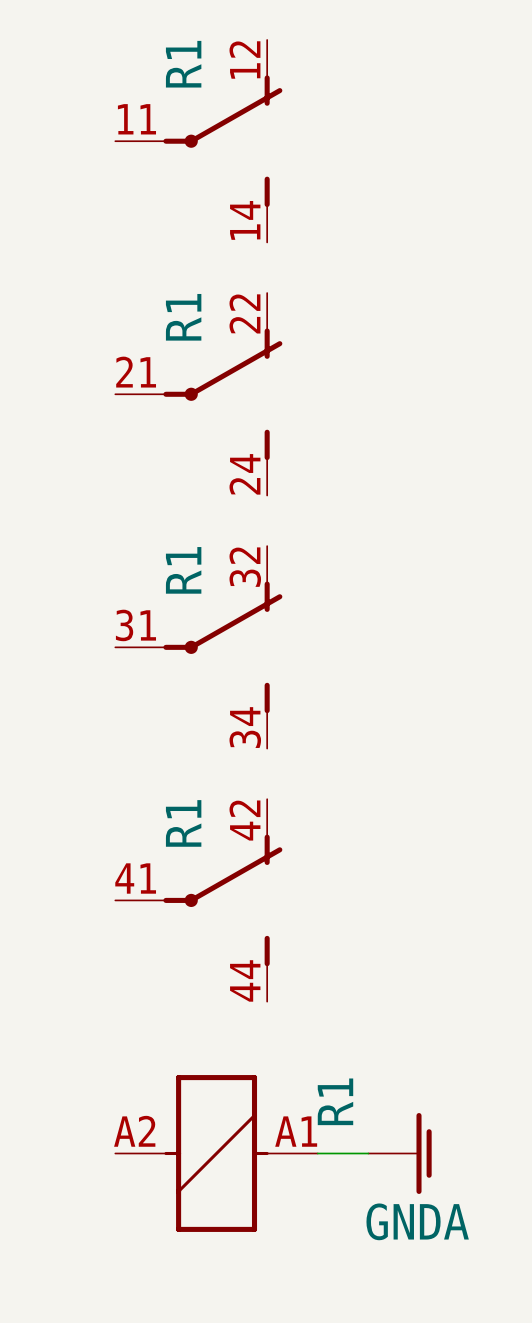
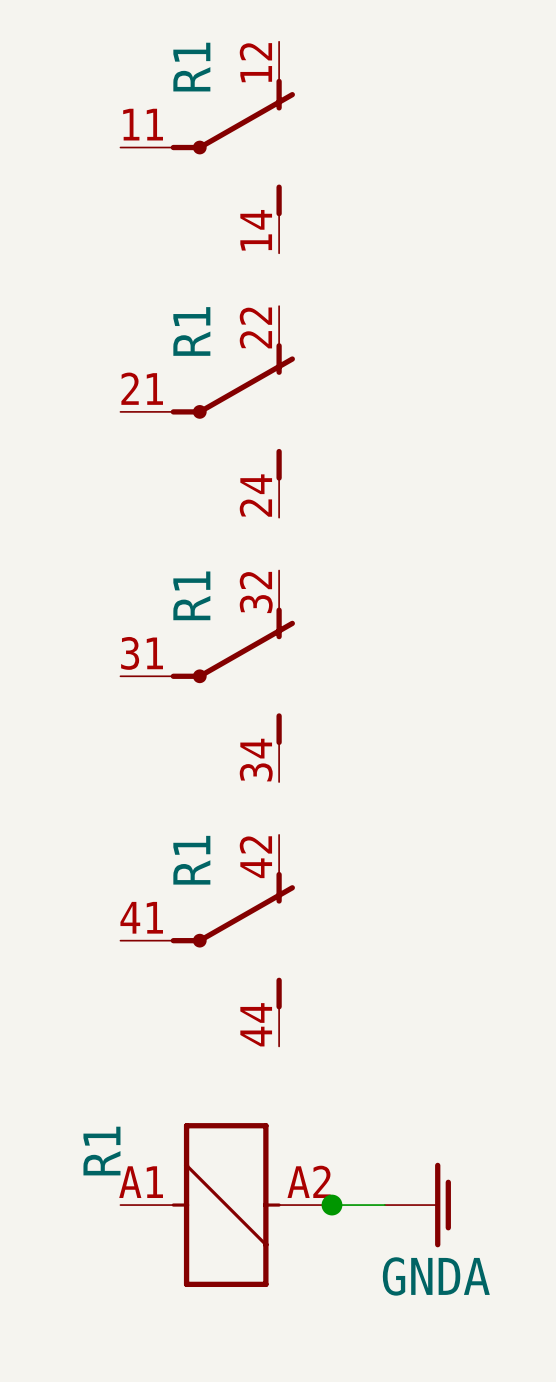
R1 flip: as is (216, 1153) -> left-right (226, 1205)
junction: none -> (331, 1205)

